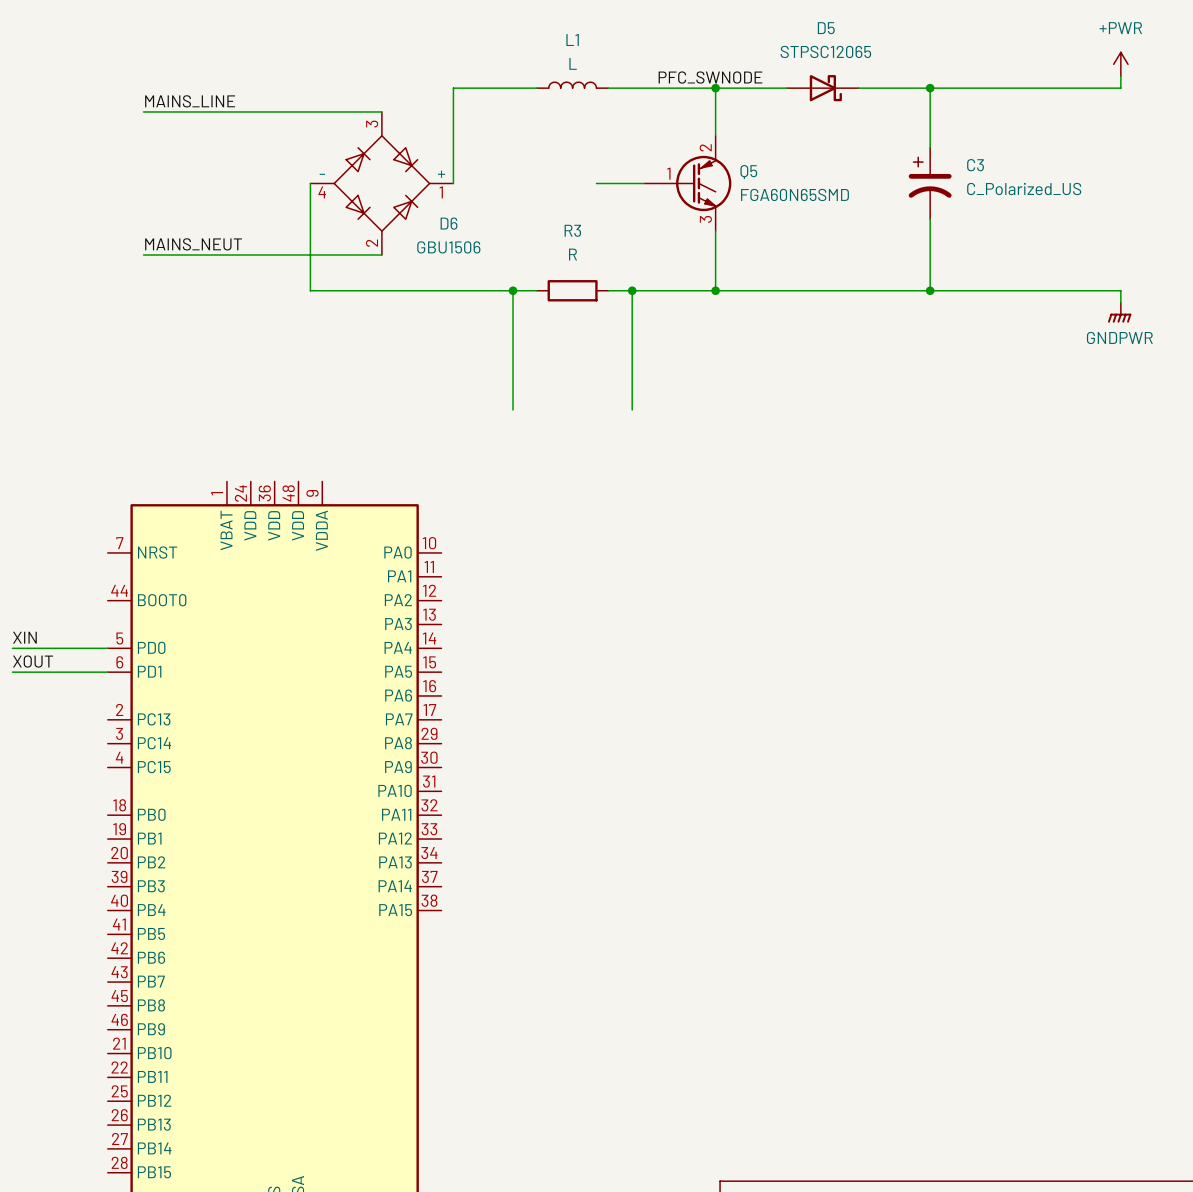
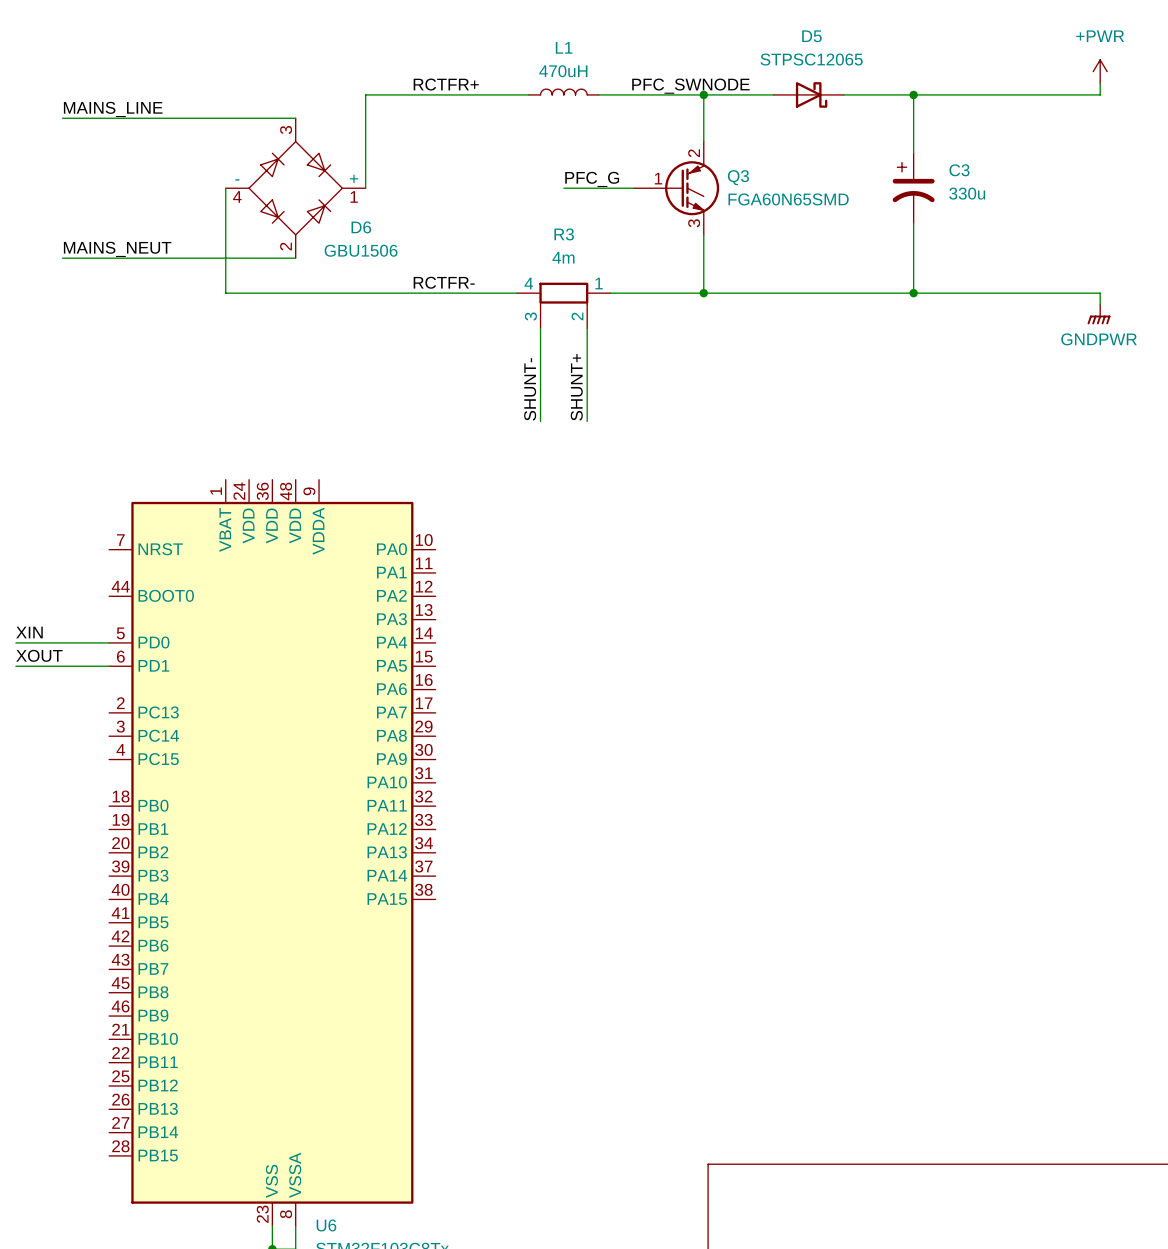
L1 value: L (573, 63) -> 470uH (563, 71)
label: none -> RCTFR+ (446, 84)
wire: (453, 88) (453, 183) -> (447, 94) (365, 94) (365, 188)
label position: MAINS_LINE (190, 101) -> MAINS_LINE (113, 109)
wire: none -> (62, 118) (144, 118)
wire: (298, 111) (381, 111) -> none
label: none -> PFC_G (592, 179)
Q5 name: Q5 (748, 172) -> Q3 (738, 177)
wire: (310, 183) (310, 290) -> (225, 188) (225, 293) (307, 293)
D6 position: (381, 183) -> (295, 188)
wire: none -> (563, 188) (587, 188)
C3 value: C_Polarized_US (1024, 189) -> 330u (967, 193)
label position: MAINS_NEUT (193, 244) -> MAINS_NEUT (117, 249)
R3 value: R (572, 254) -> 4m (563, 257)
wire: none -> (62, 258) (144, 258)
wire: (298, 255) (381, 255) -> none
label: none -> RCTFR- (444, 282)
R3 symbol: [536, 280, 609, 302] -> [517, 282, 611, 329]
wire: (513, 290) (513, 409) -> none
junction: (513, 290) -> none
wire: (632, 290) (632, 409) -> none
junction: (632, 290) -> none
wire: none -> (540, 328) (540, 421)
wire: none -> (587, 328) (587, 421)
label: none -> SHUNT+ (576, 387)
label: none -> SHUNT- (530, 389)

